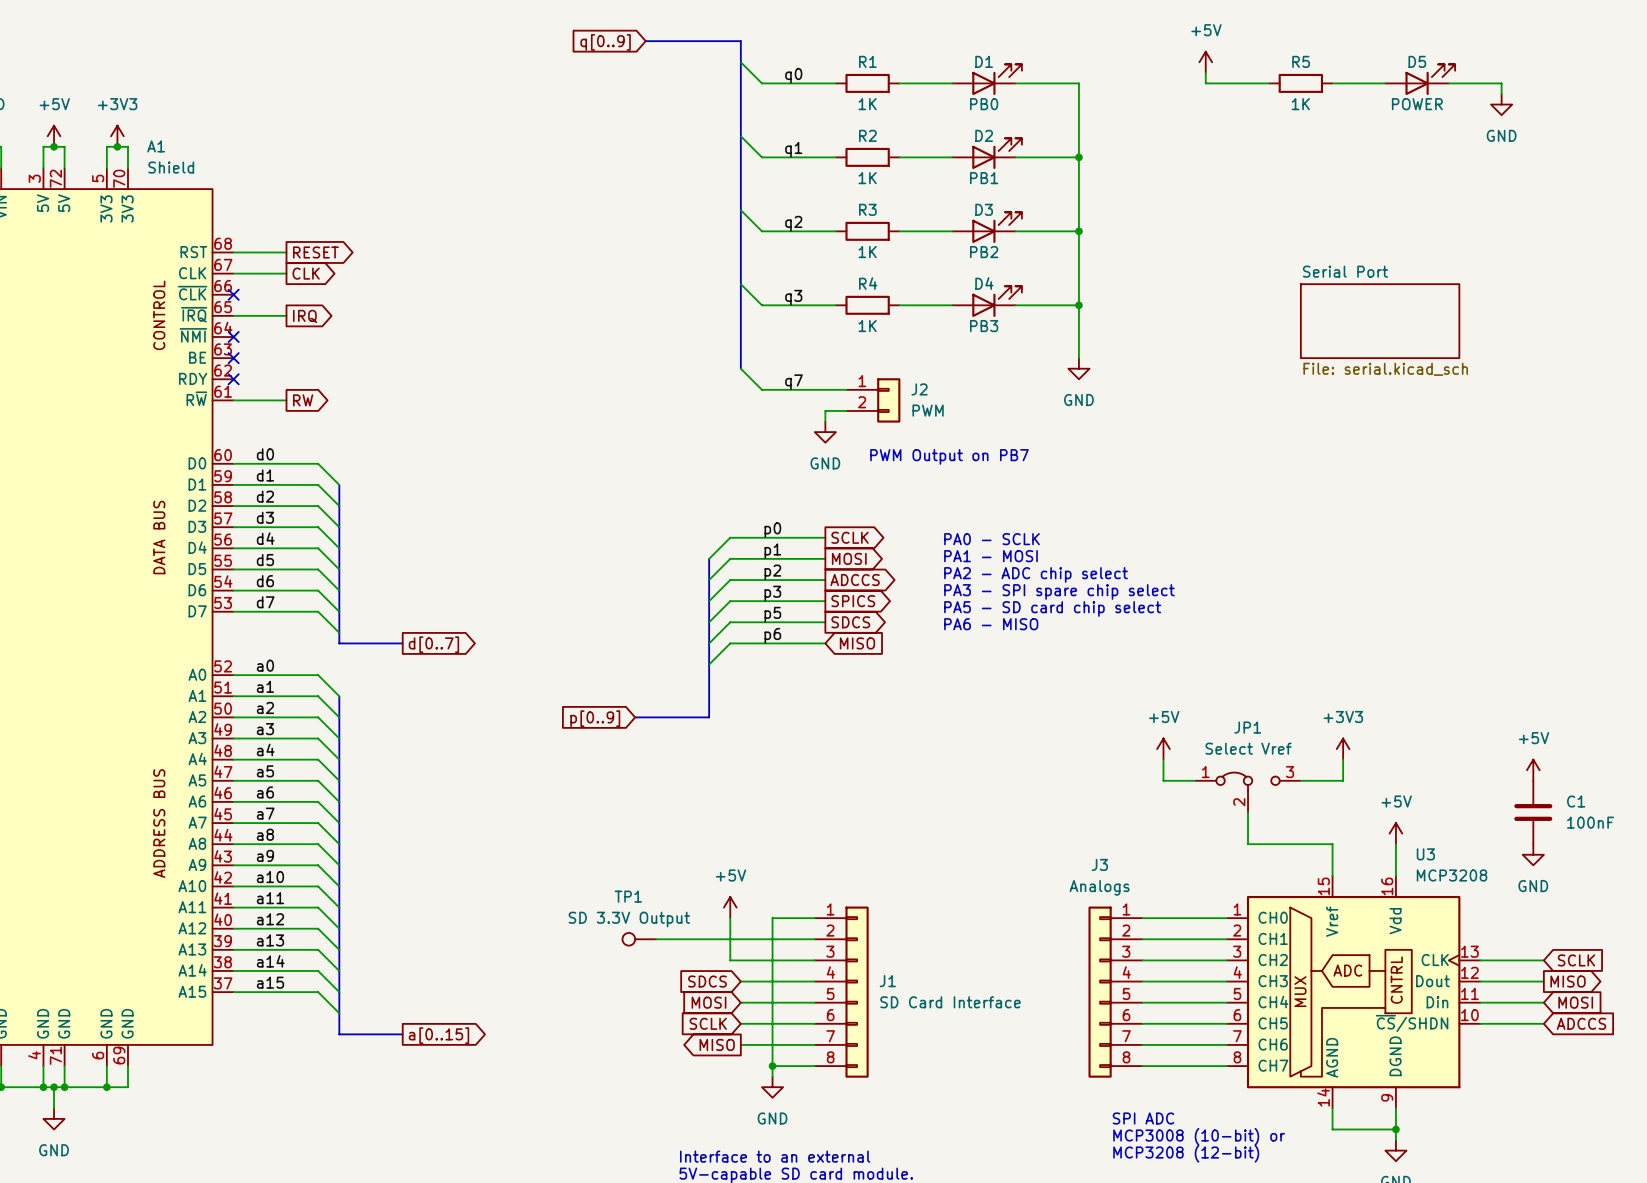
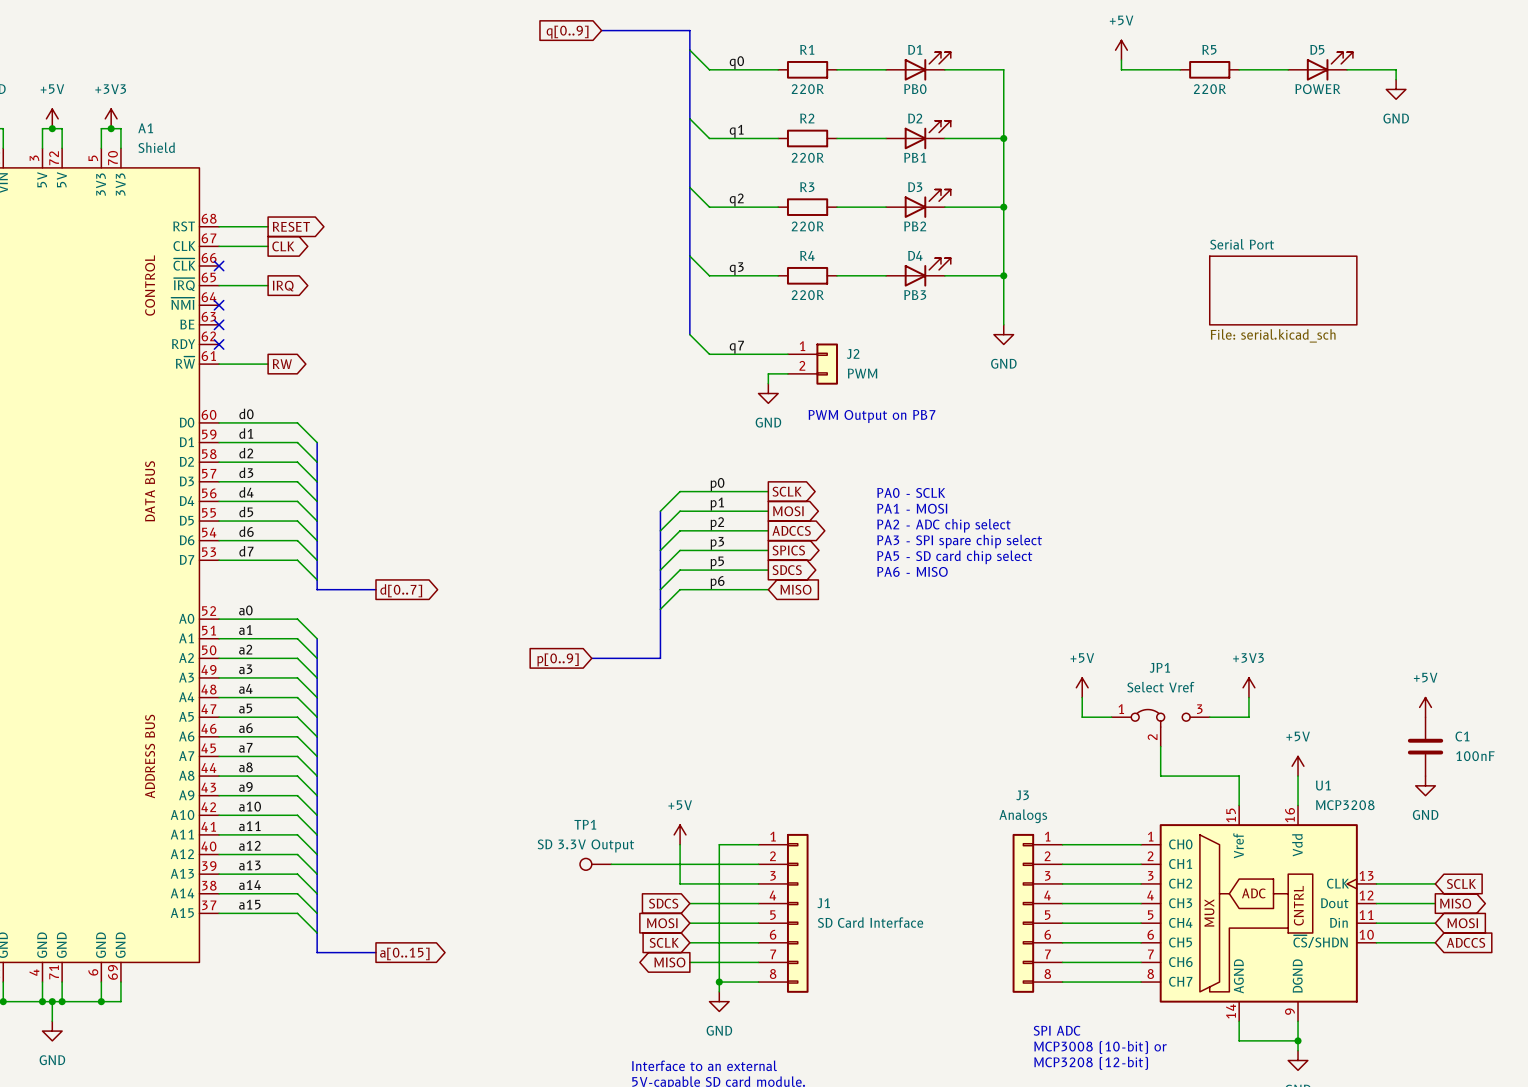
R1 value: 1K (867, 104) -> 220R (807, 89)
R5 value: 1K (1300, 104) -> 220R (1210, 89)
R2 value: 1K (867, 178) -> 220R (807, 157)
R3 value: 1K (867, 252) -> 220R (807, 226)
R4 value: 1K (867, 326) -> 220R (807, 295)
U3 name: U3 (1425, 854) -> U1 (1323, 785)

